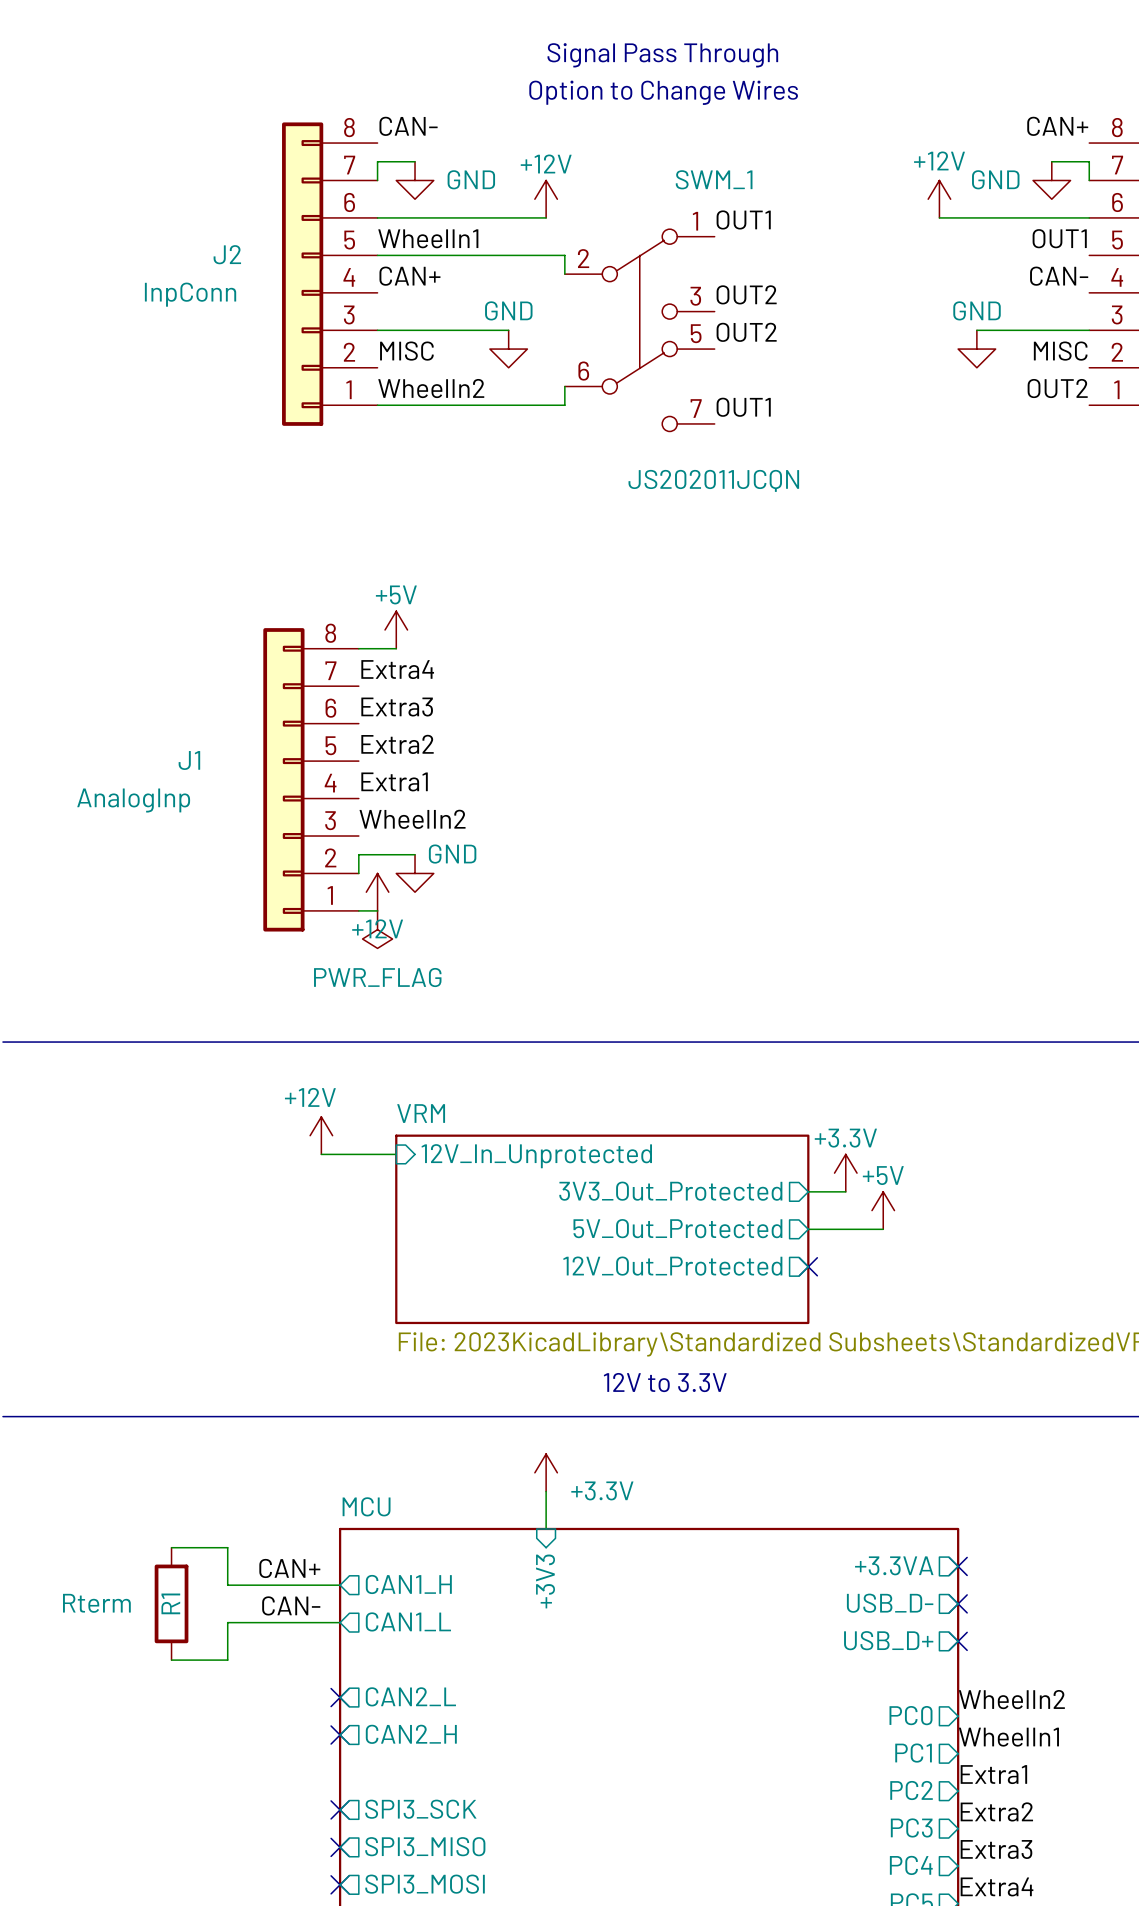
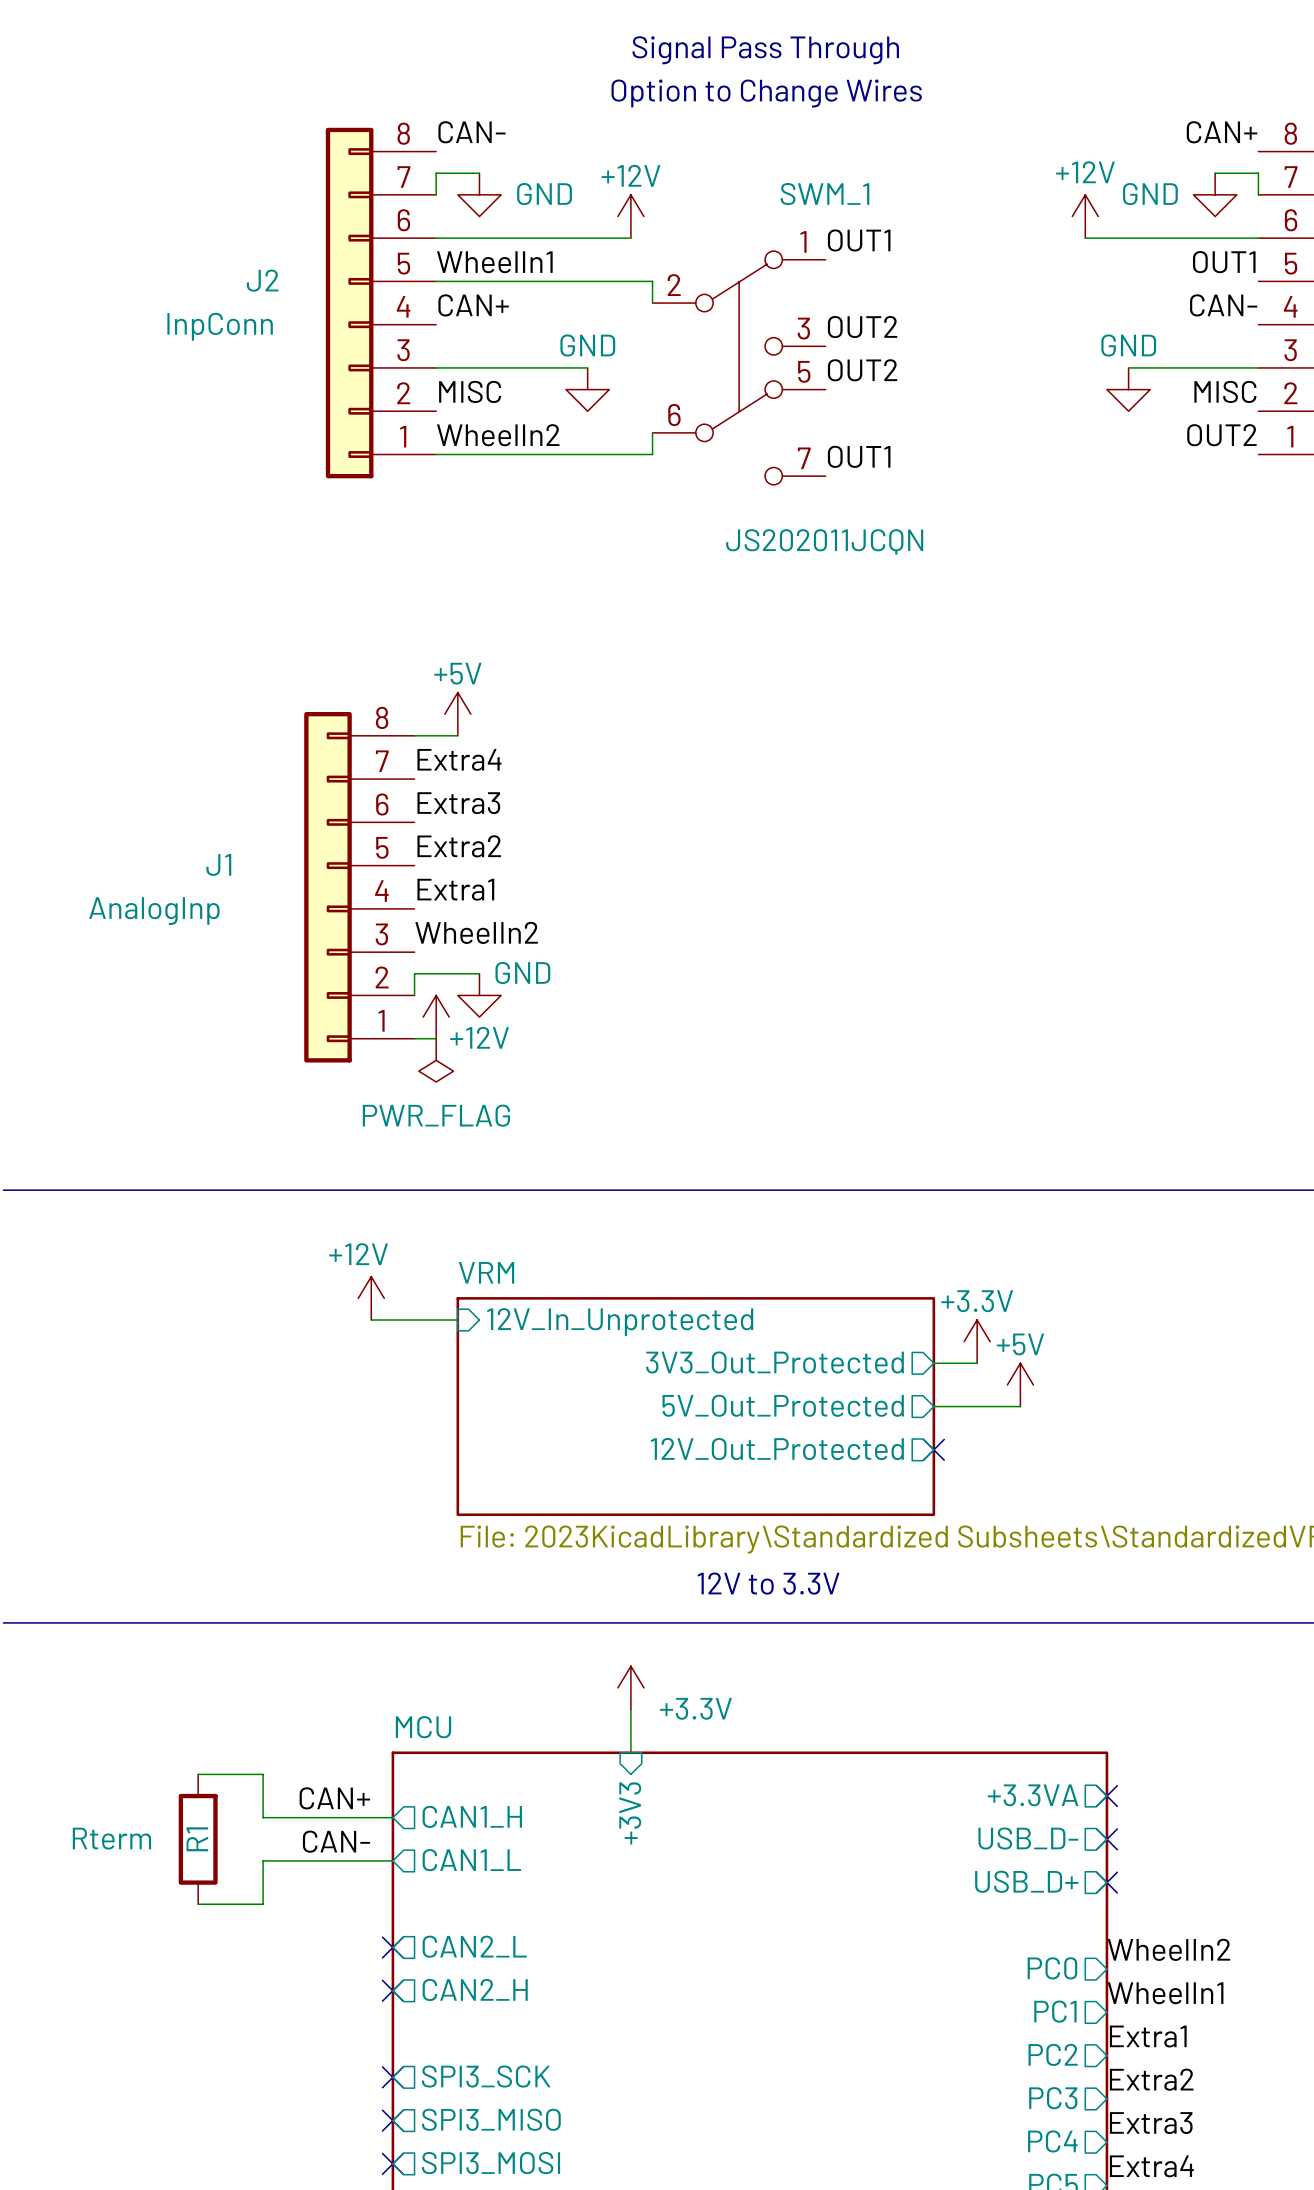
power symbol text position: +12V (377, 928) -> +12V (479, 1037)

